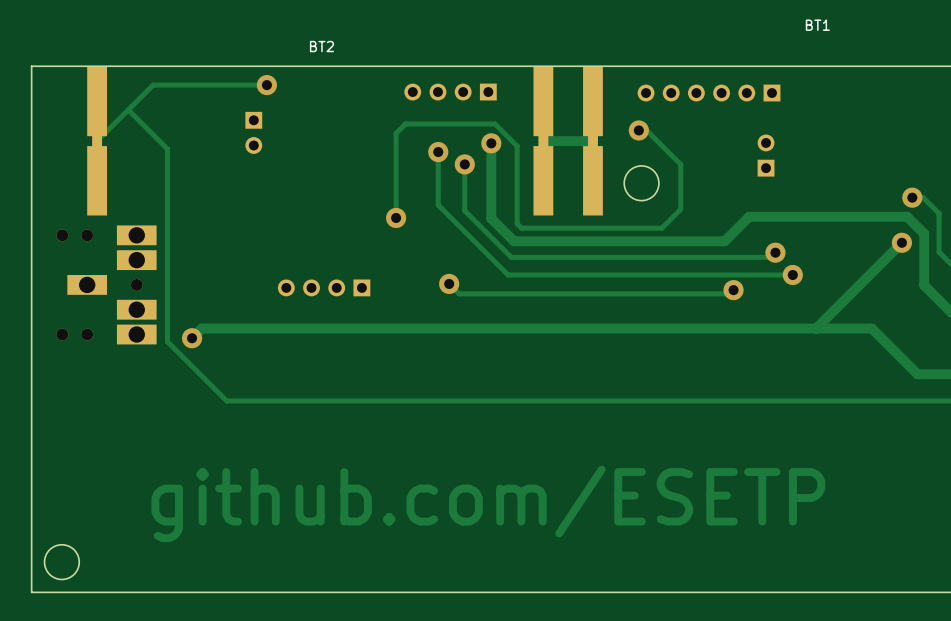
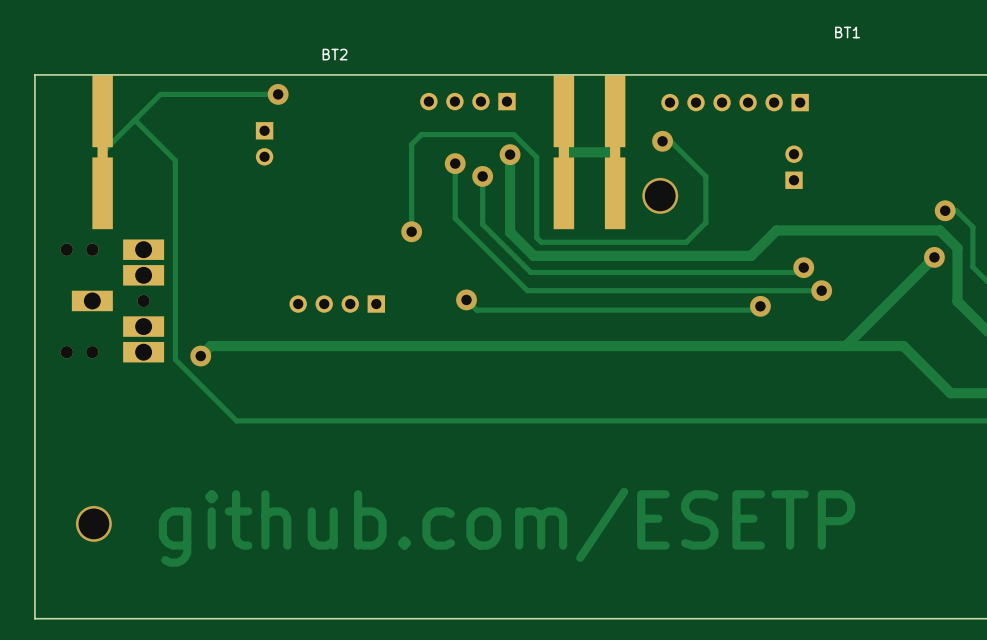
round board edge: [623, 165, 660, 202] -> none
via: none -> (660, 195)
via: none -> (93, 523)
round board edge: [44, 544, 80, 580] -> none

